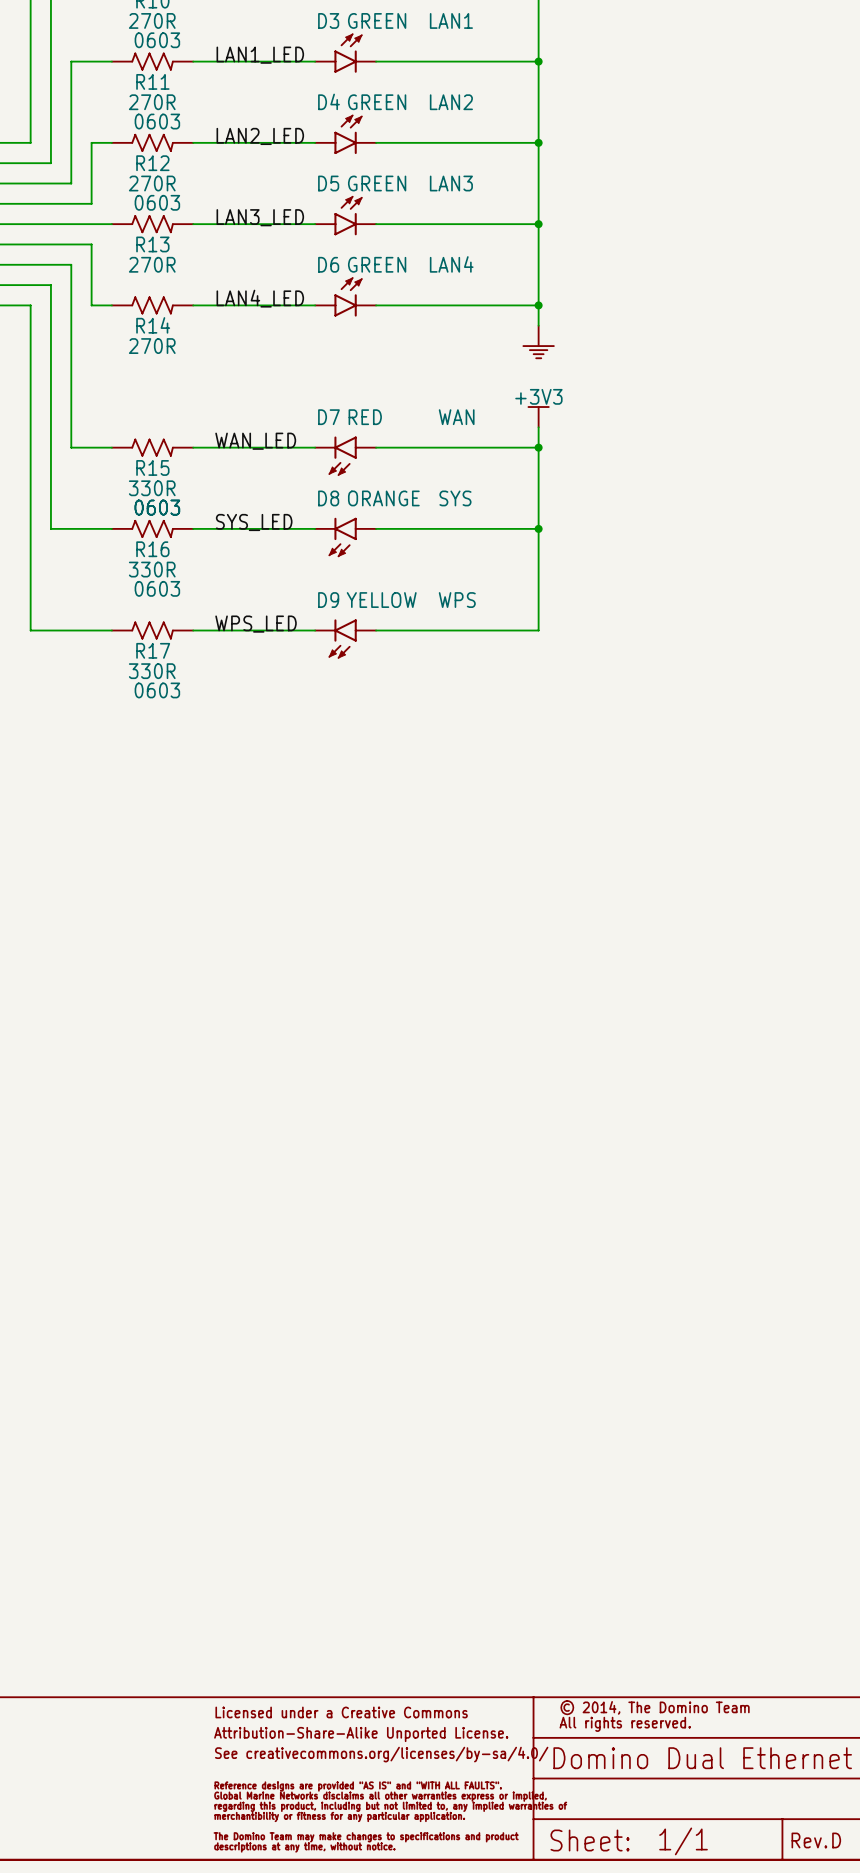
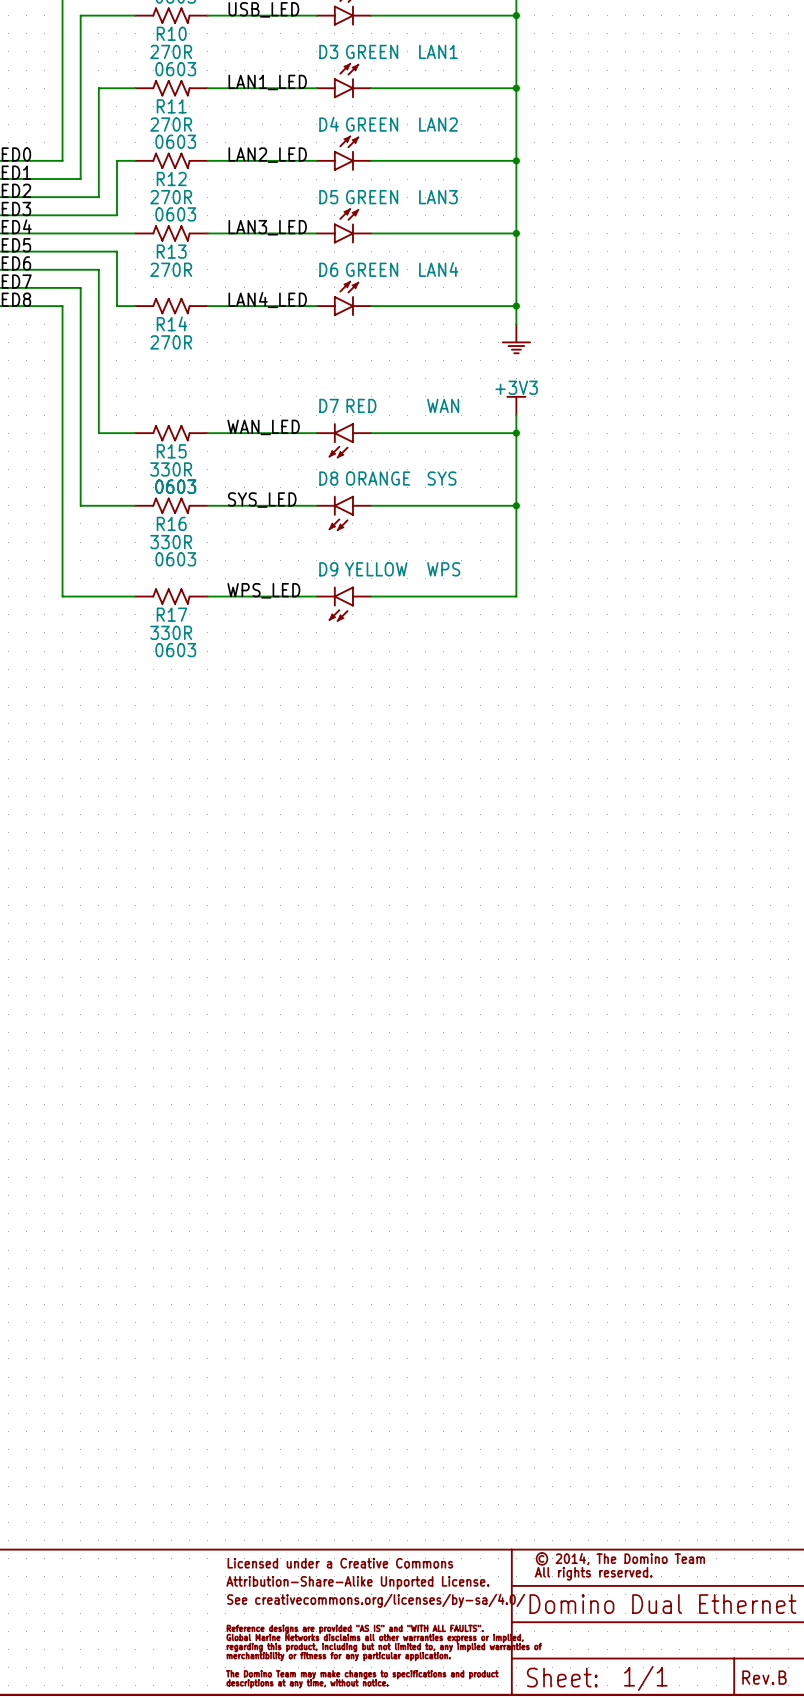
text: D (836, 1840) -> B (782, 1677)

